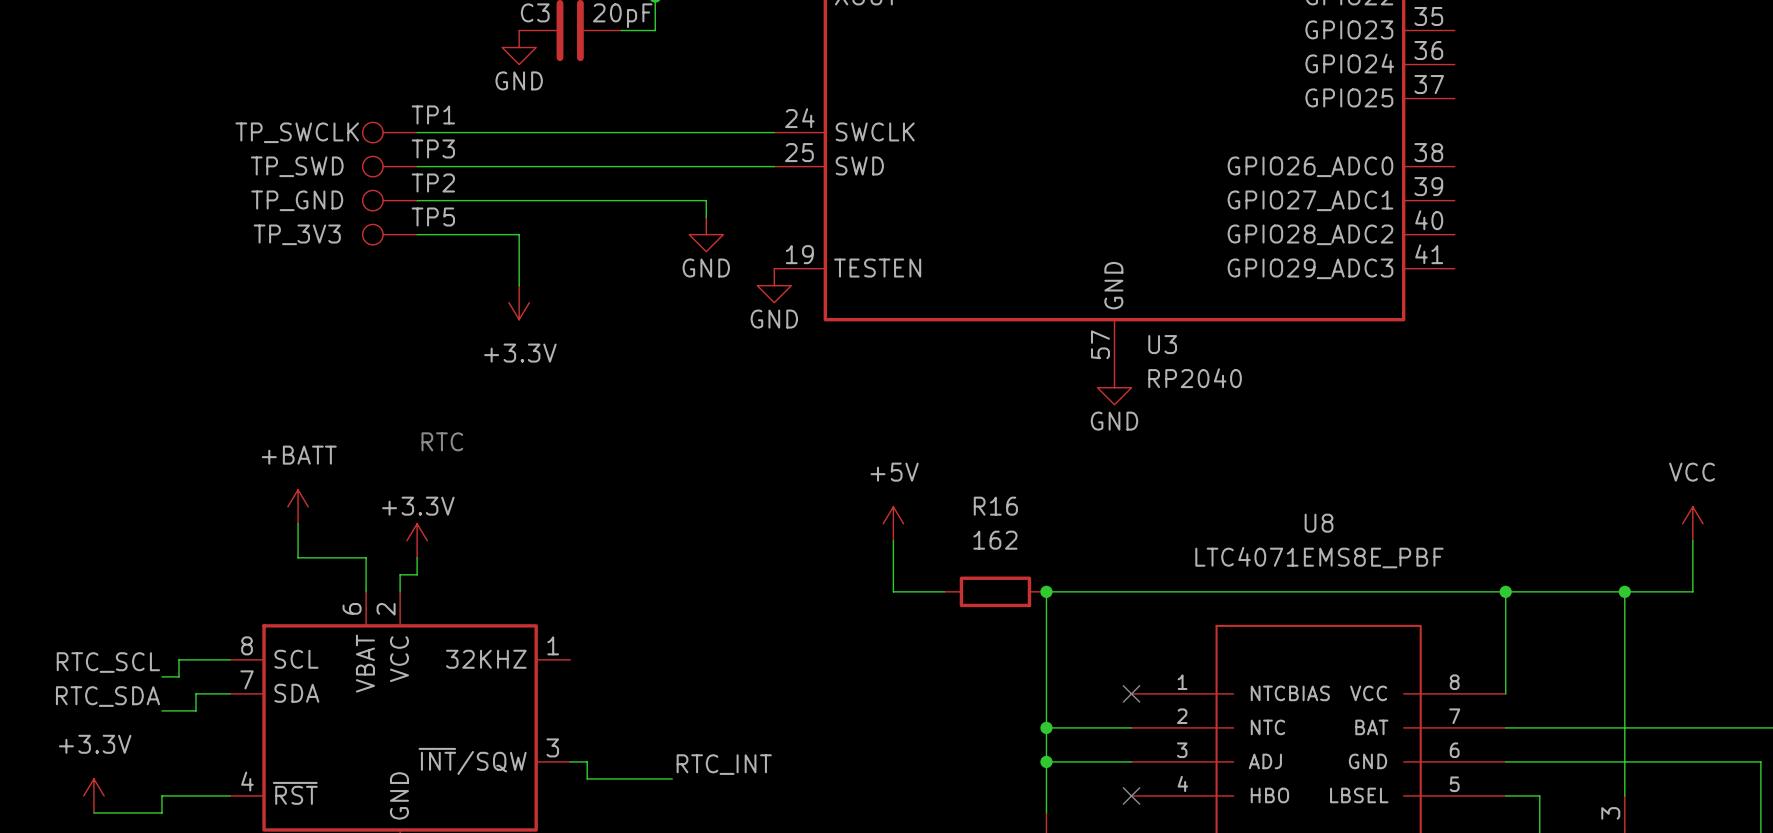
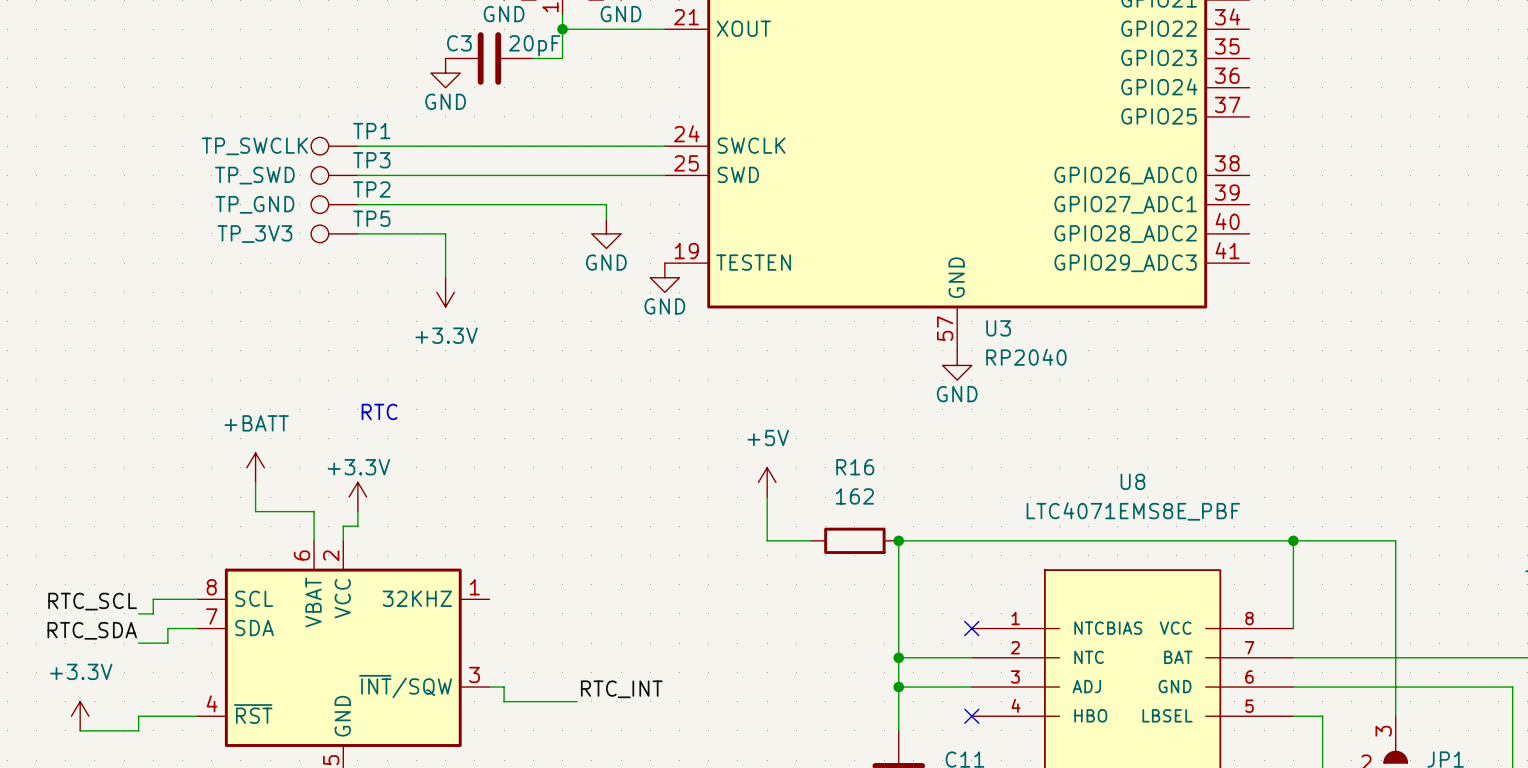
power symbol: VCC (1692, 523) -> none
wire: (1692, 540) (1692, 591) (1624, 591) -> none
junction: (1624, 591) -> none

